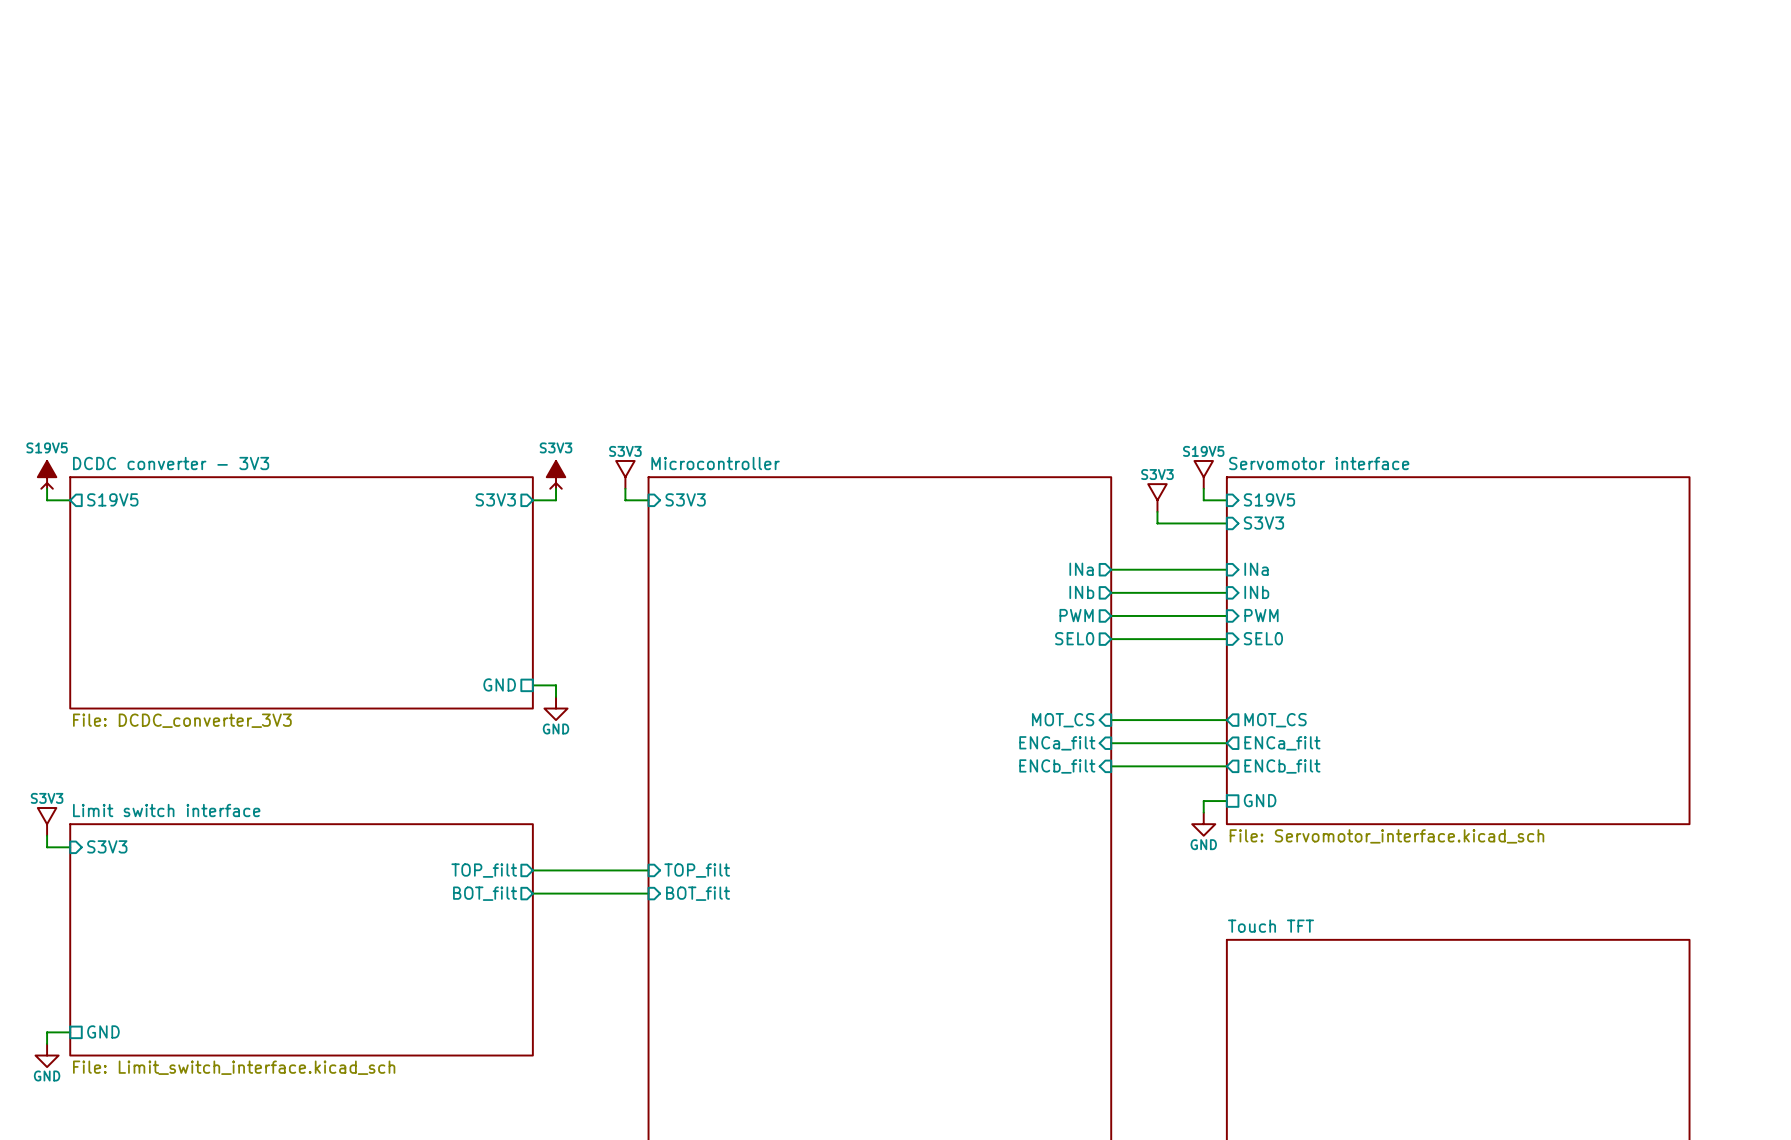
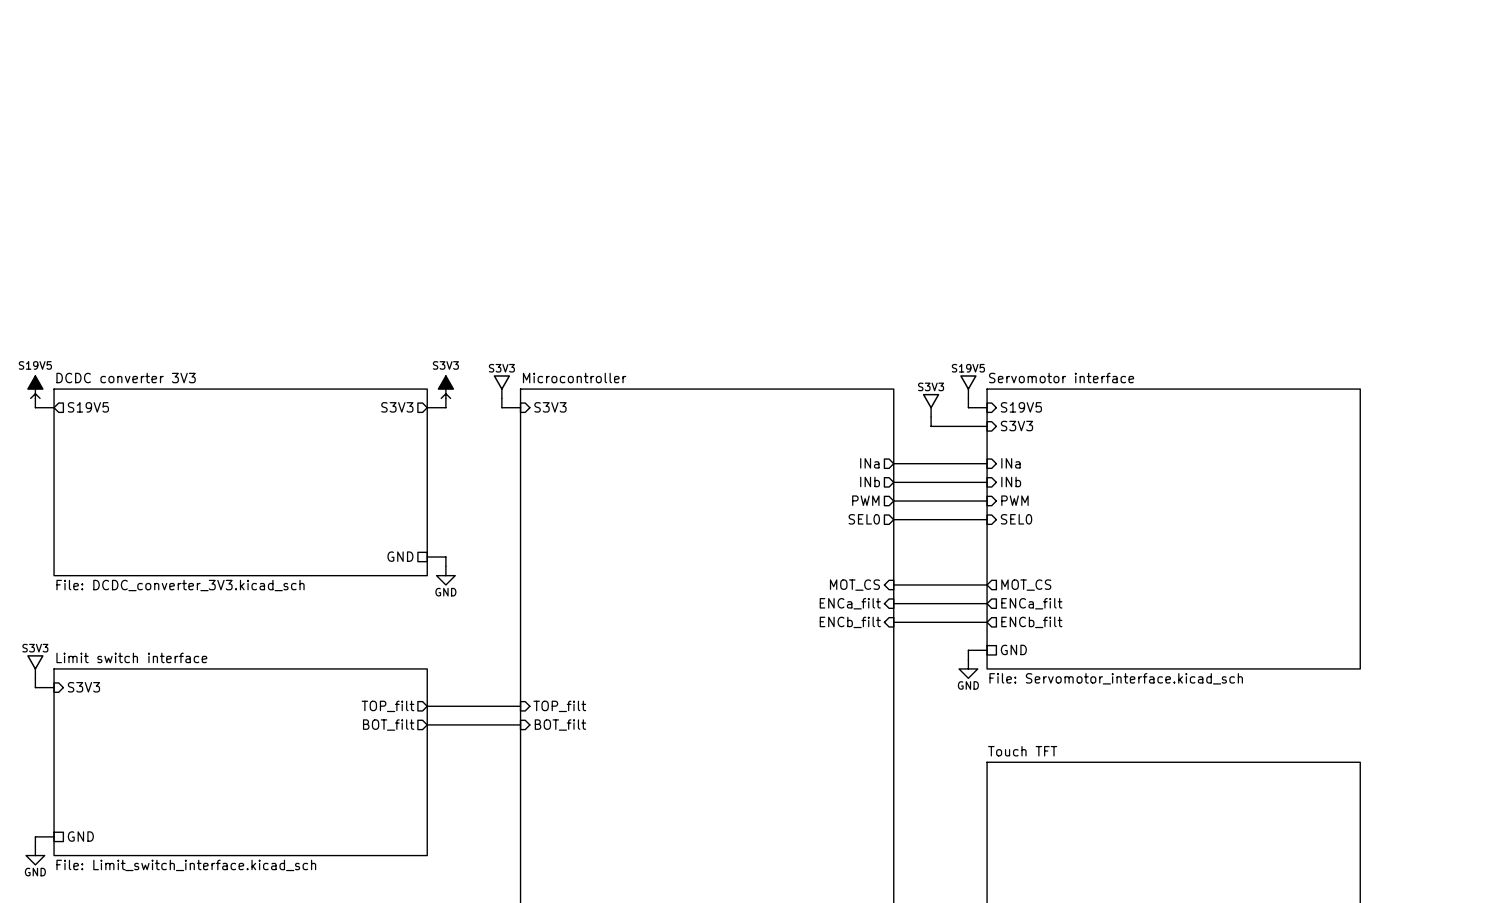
sheet DCDC converter - 3V3 name: DCDC converter - 3V3 (171, 463) -> DCDC converter 3V3 (126, 378)
sheet DCDC converter - 3V3 value: File: DCDC_converter_3V3 (182, 720) -> File: DCDC_converter_3V3.kicad_sch (180, 585)

